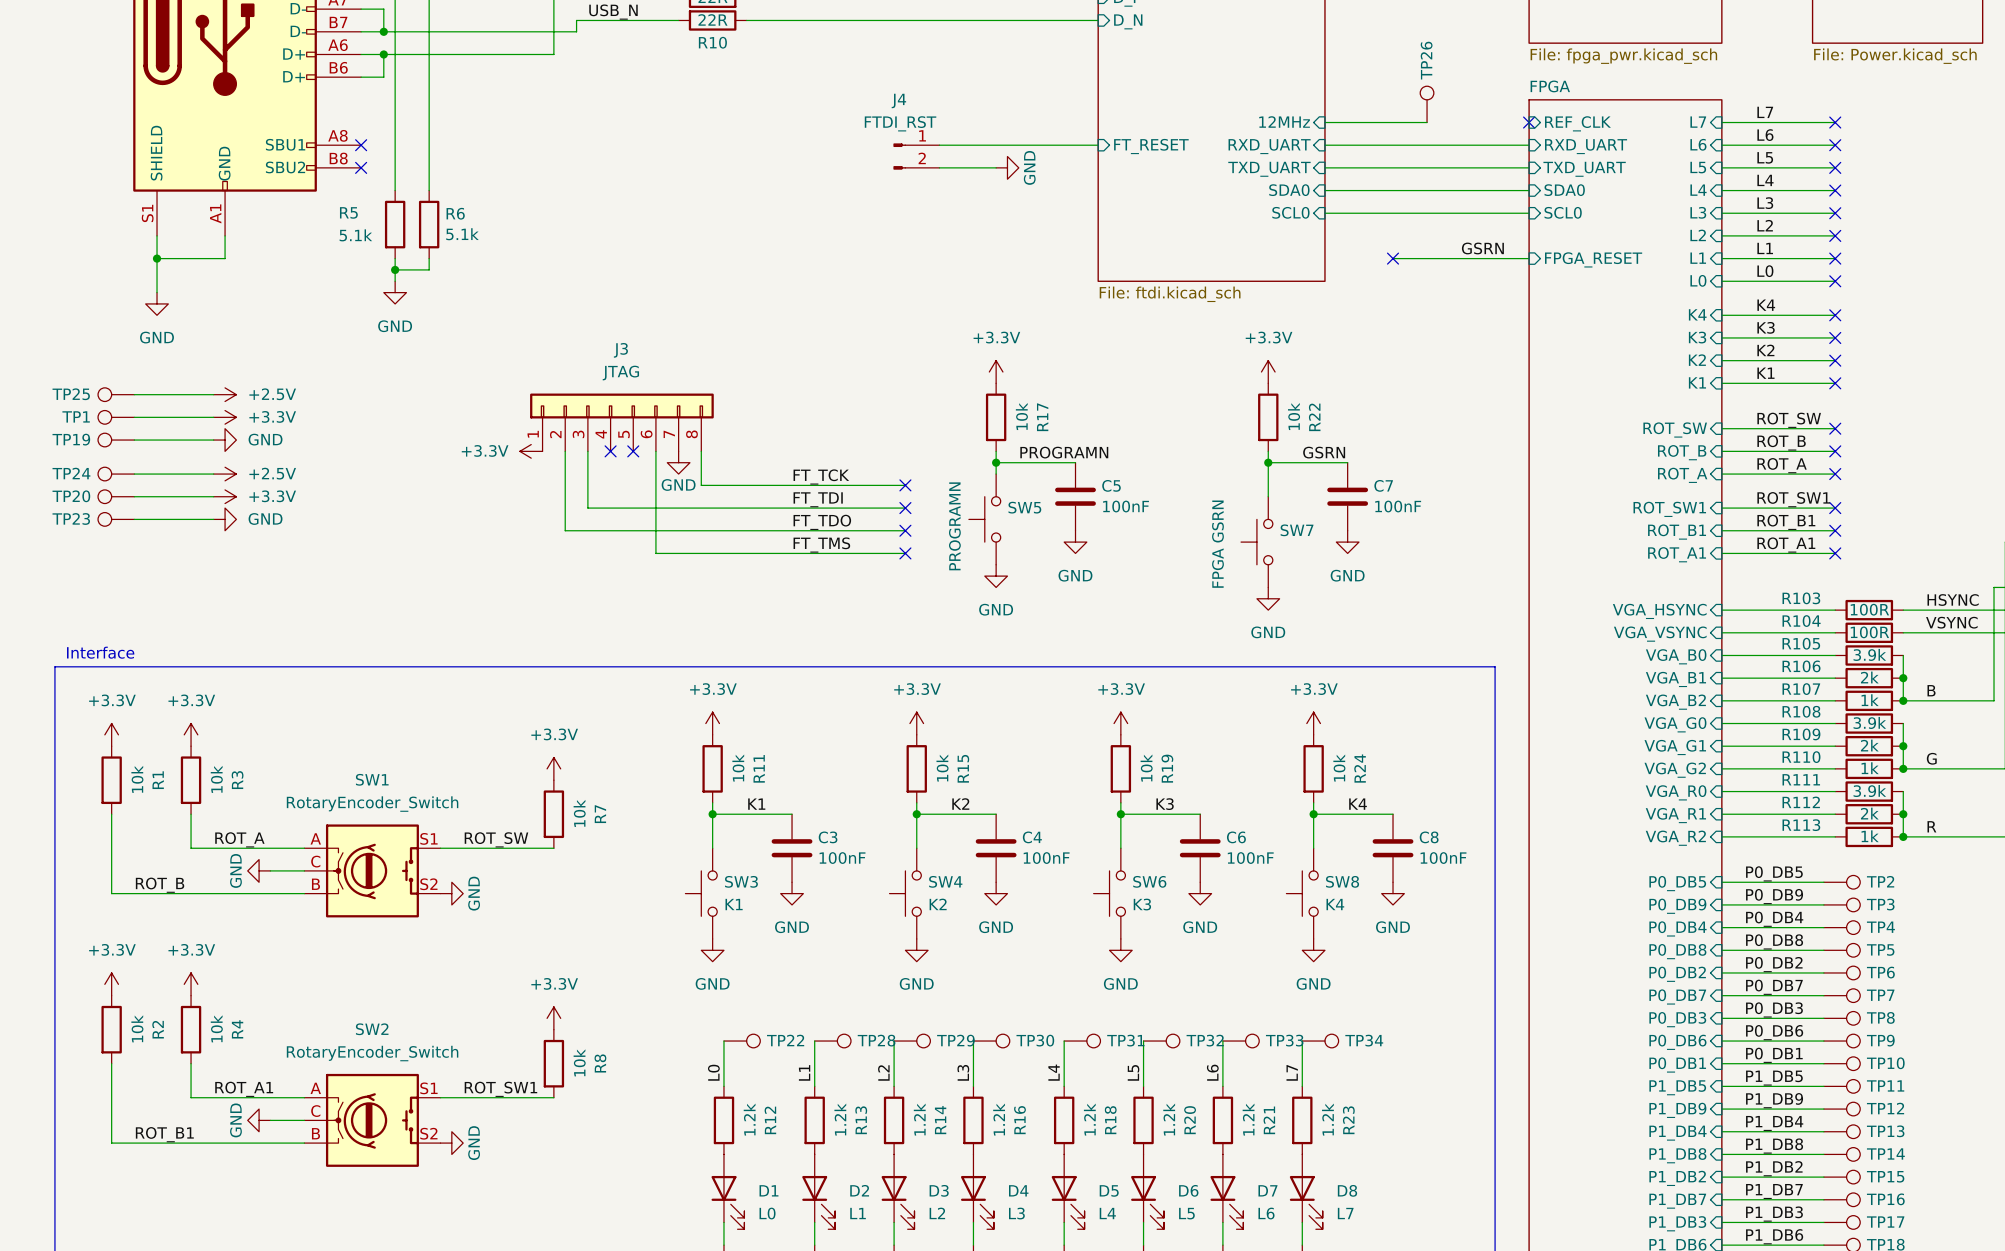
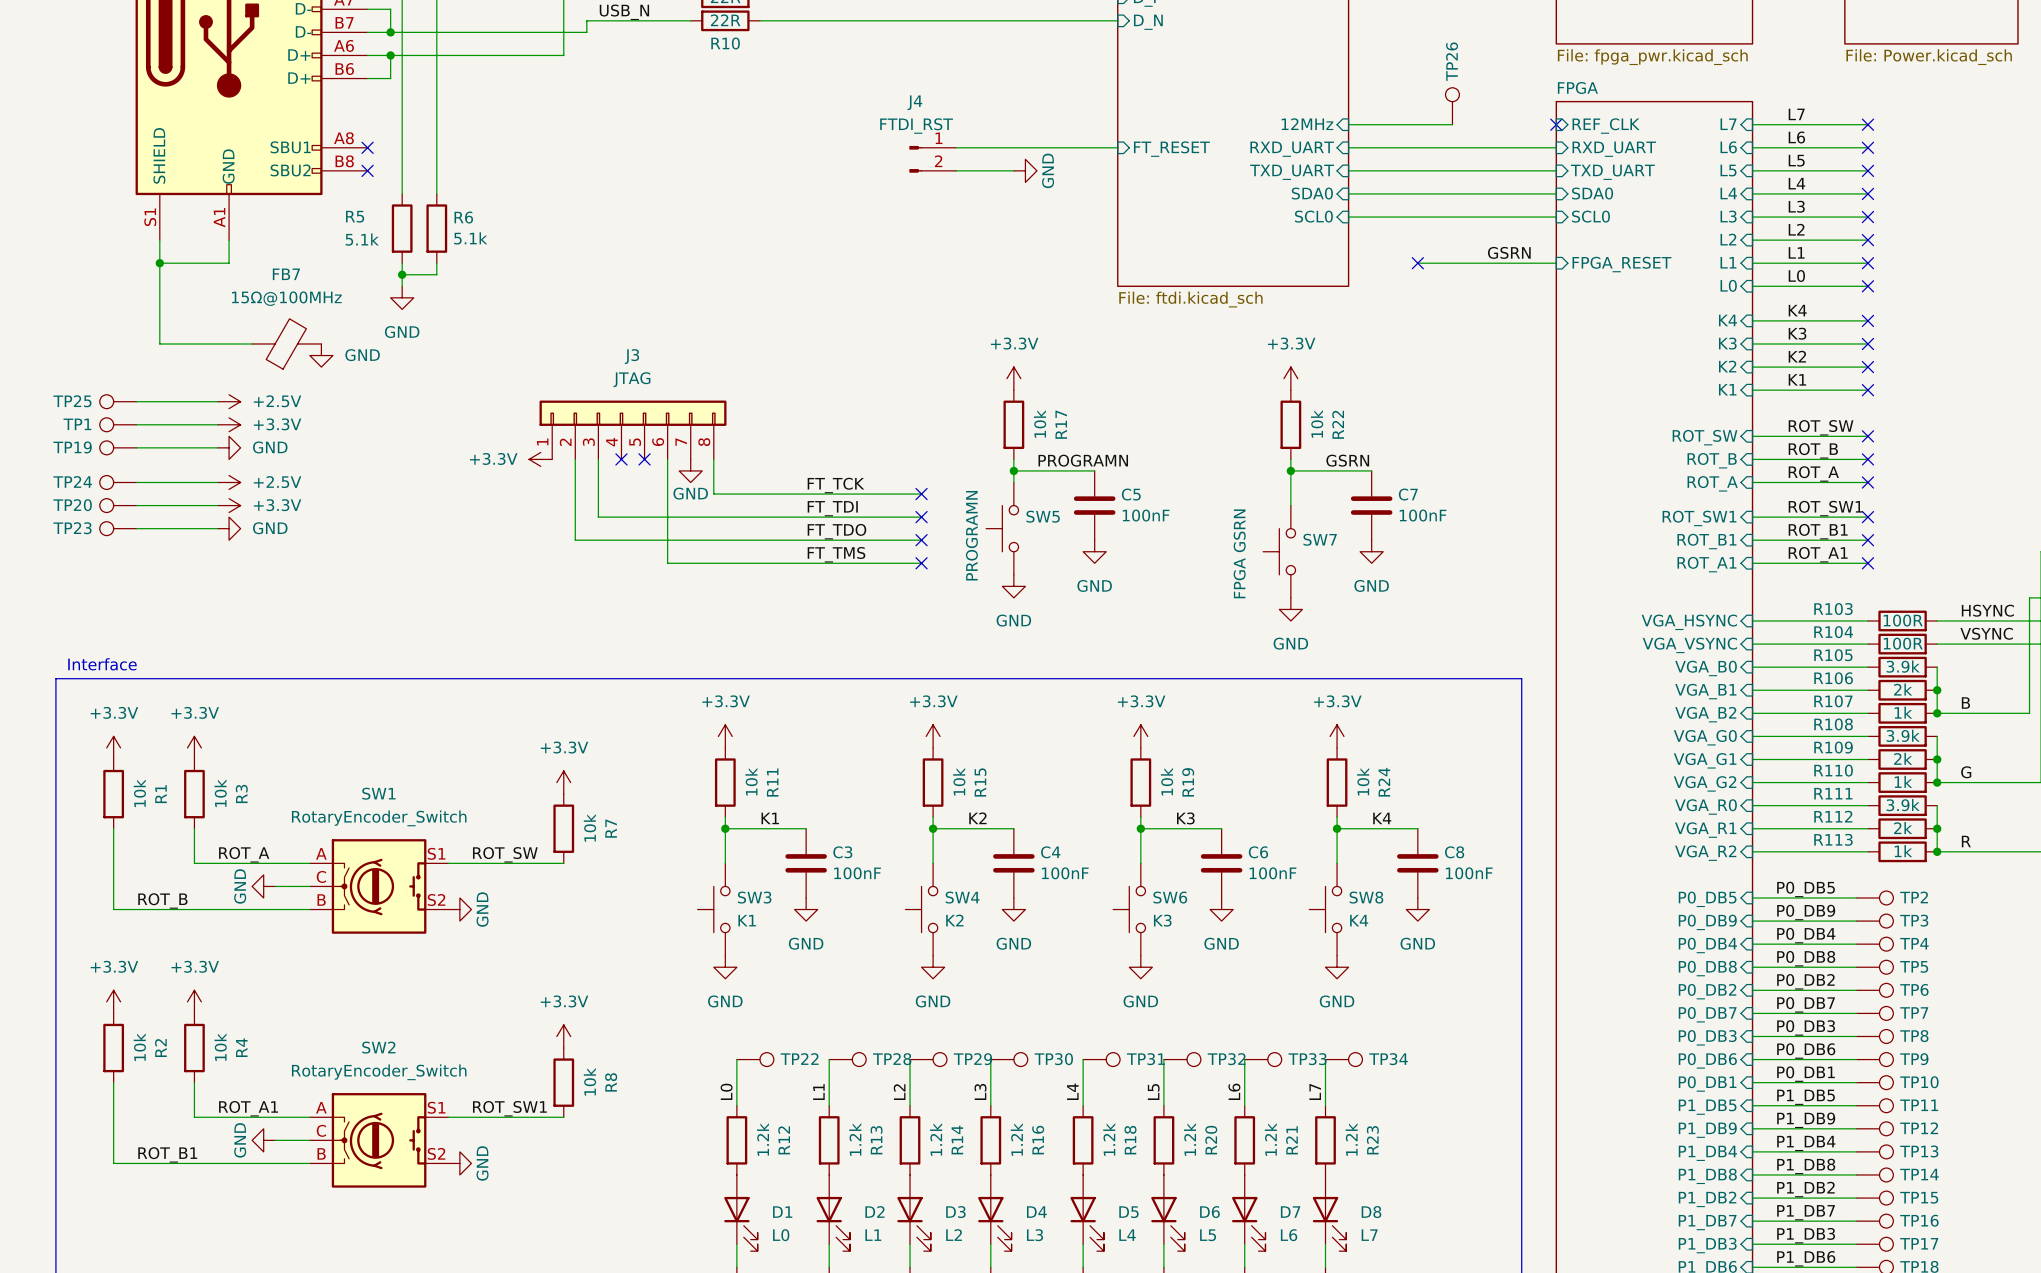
wire: none -> (159, 297) (159, 343) (252, 343)
power symbol position: GND (157, 303) -> GND (321, 355)
power symbol text position: GND (156, 337) -> GND (362, 355)
FB7: none -> 15Ω@100MHz (286, 343)

